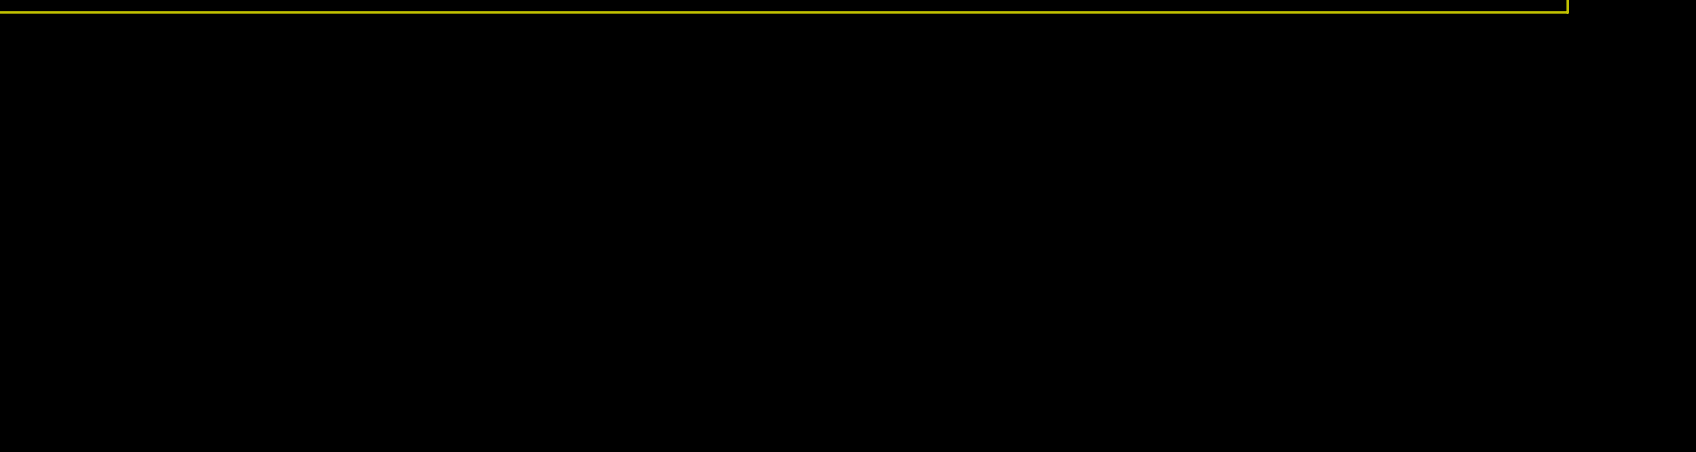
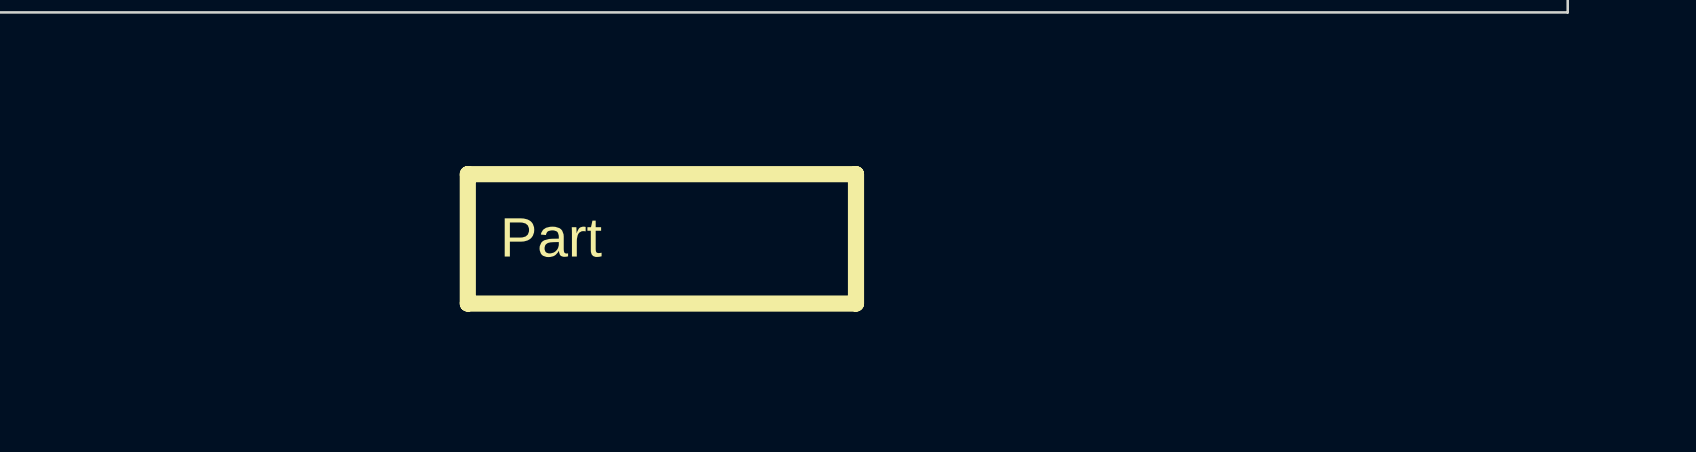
line: none -> (467, 174) (467, 303) (856, 303) (856, 174) (467, 174)
text: none -> Part (553, 237)

